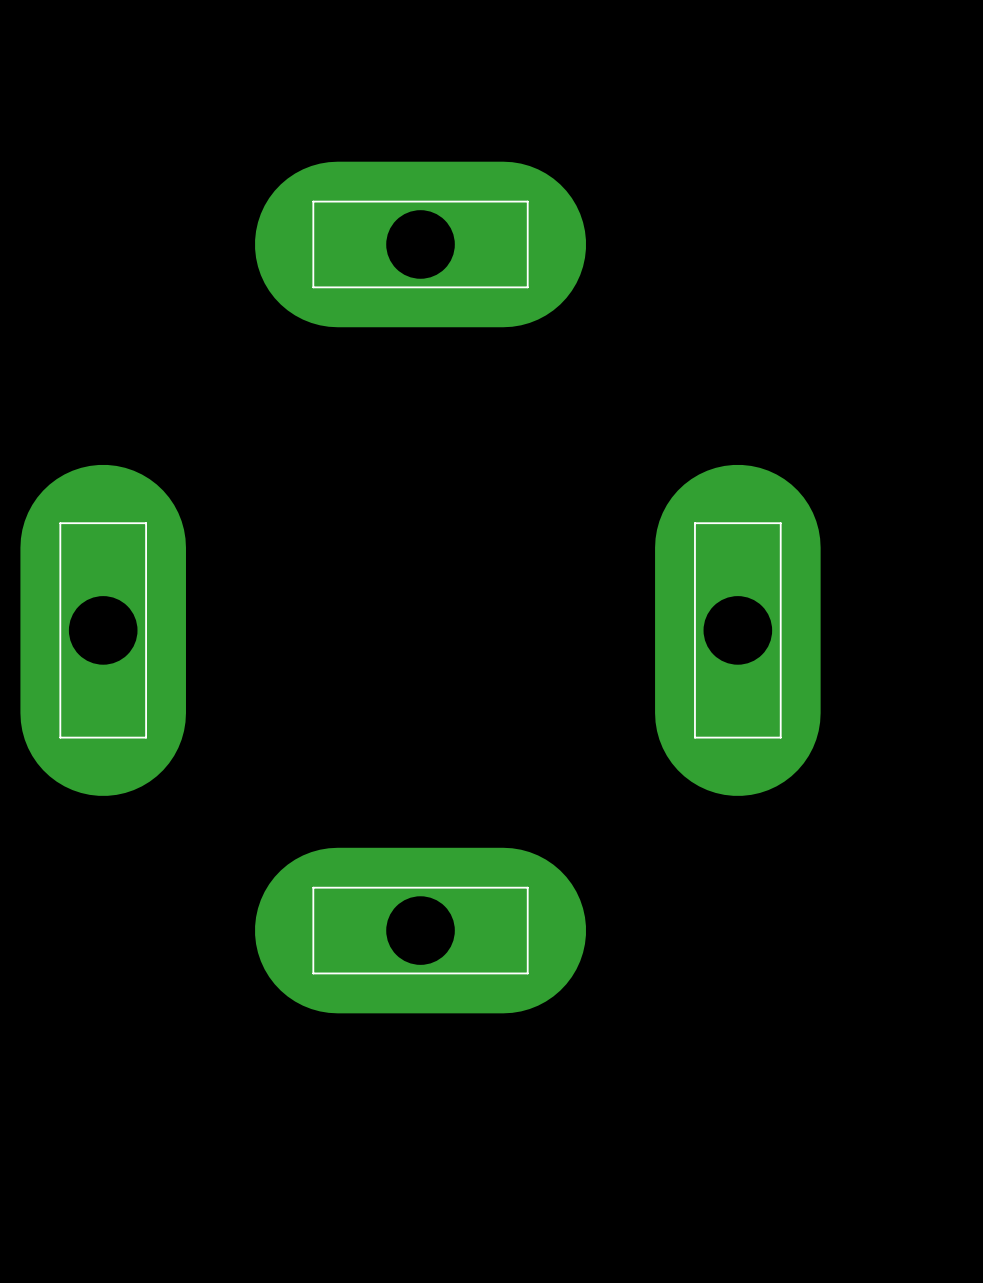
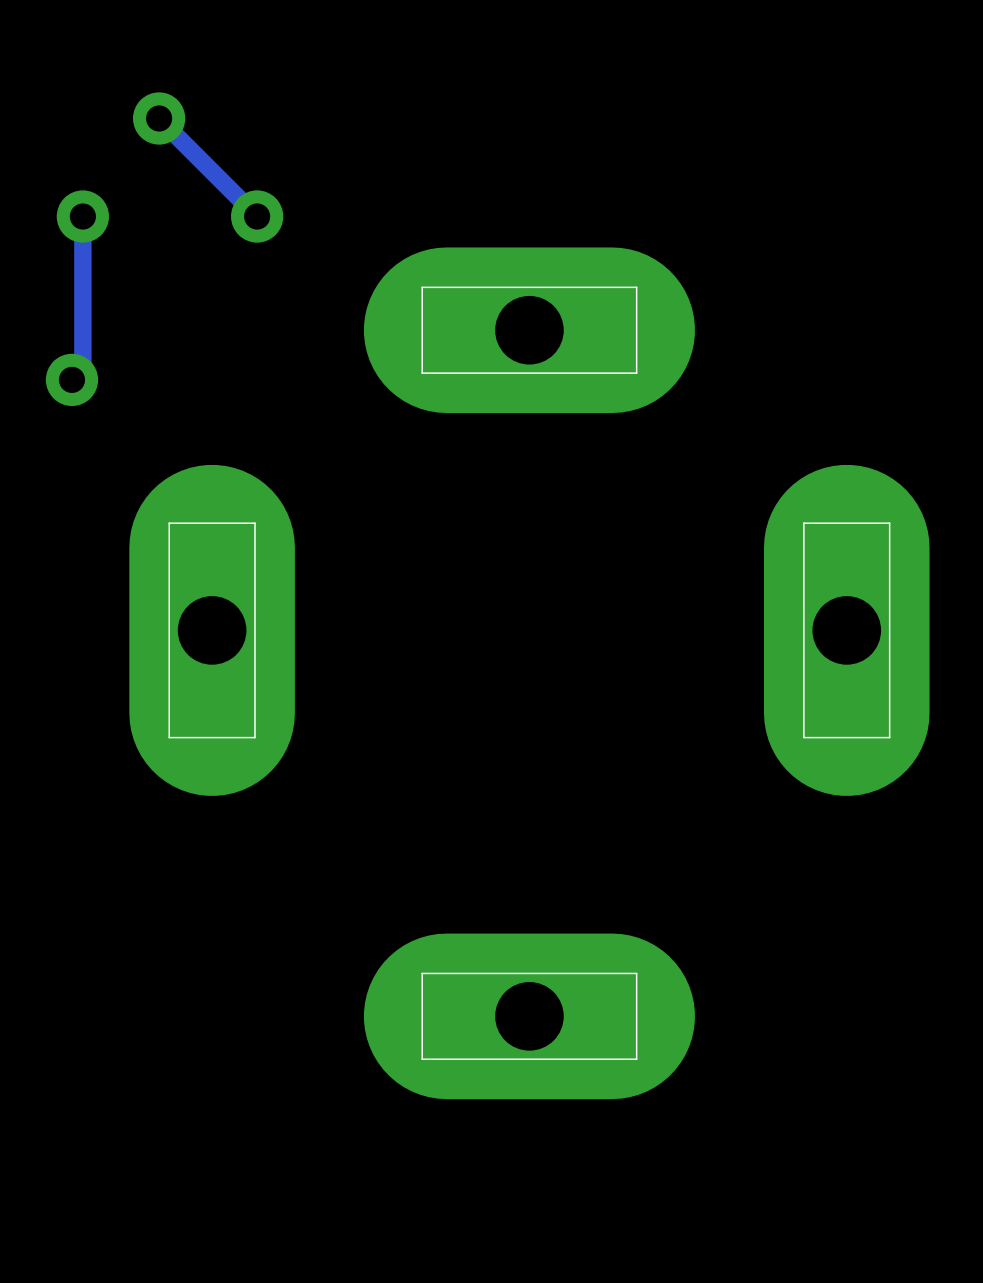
track: none -> (159, 118) (257, 216)
via: none -> (159, 118)
track: none -> (82, 216) (82, 369) (71, 379)
via: none -> (82, 216)
via: none -> (257, 216)
via: none -> (71, 379)
part rotation: 0° (420, 587) -> 180° (529, 673)

